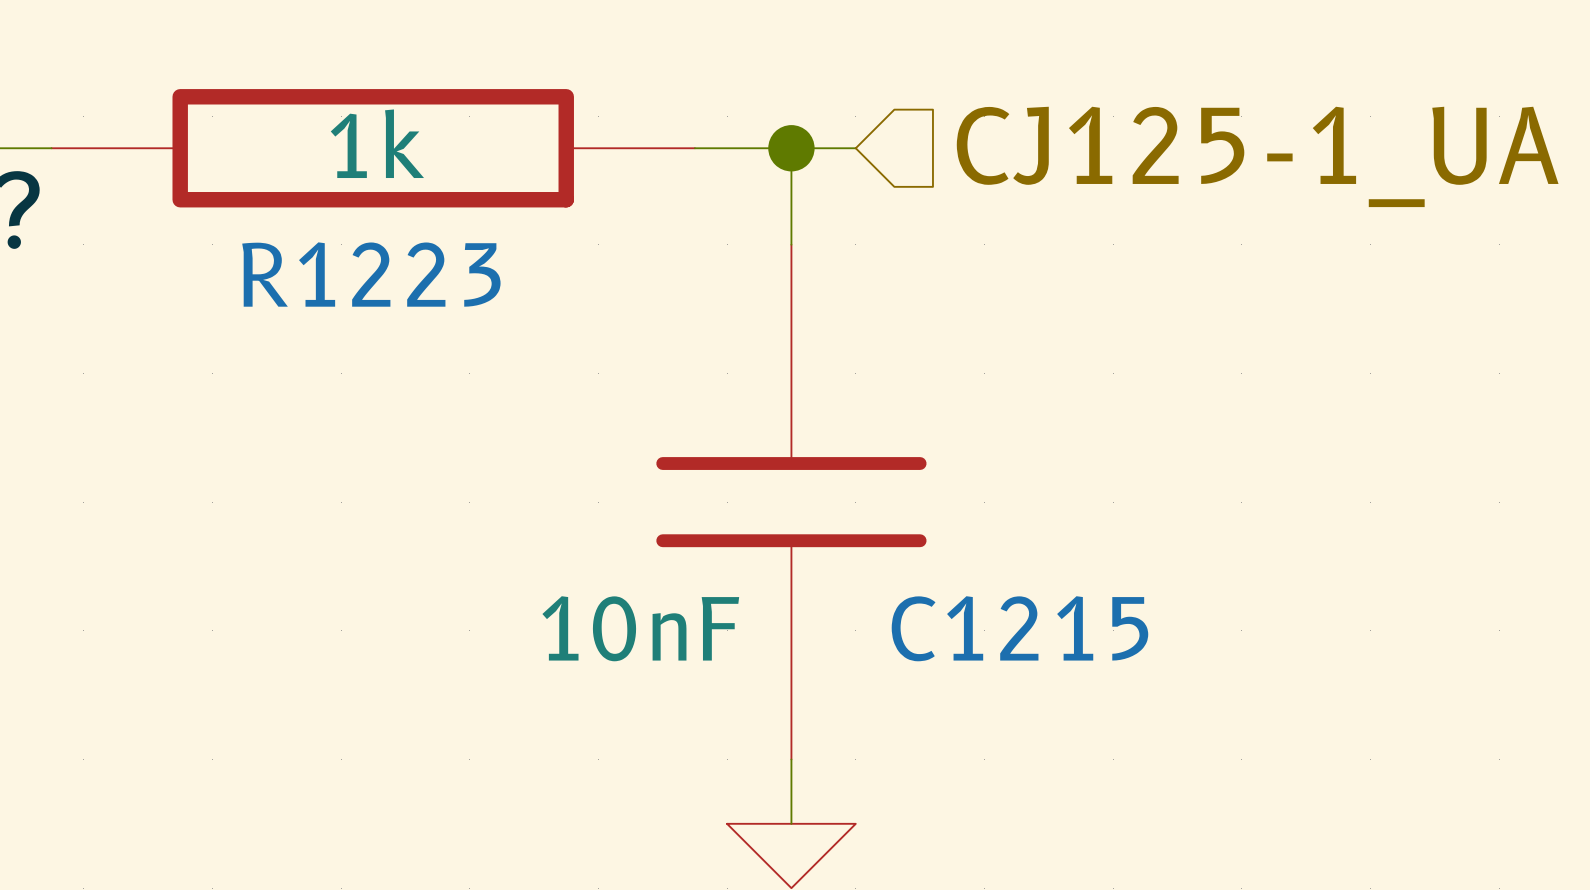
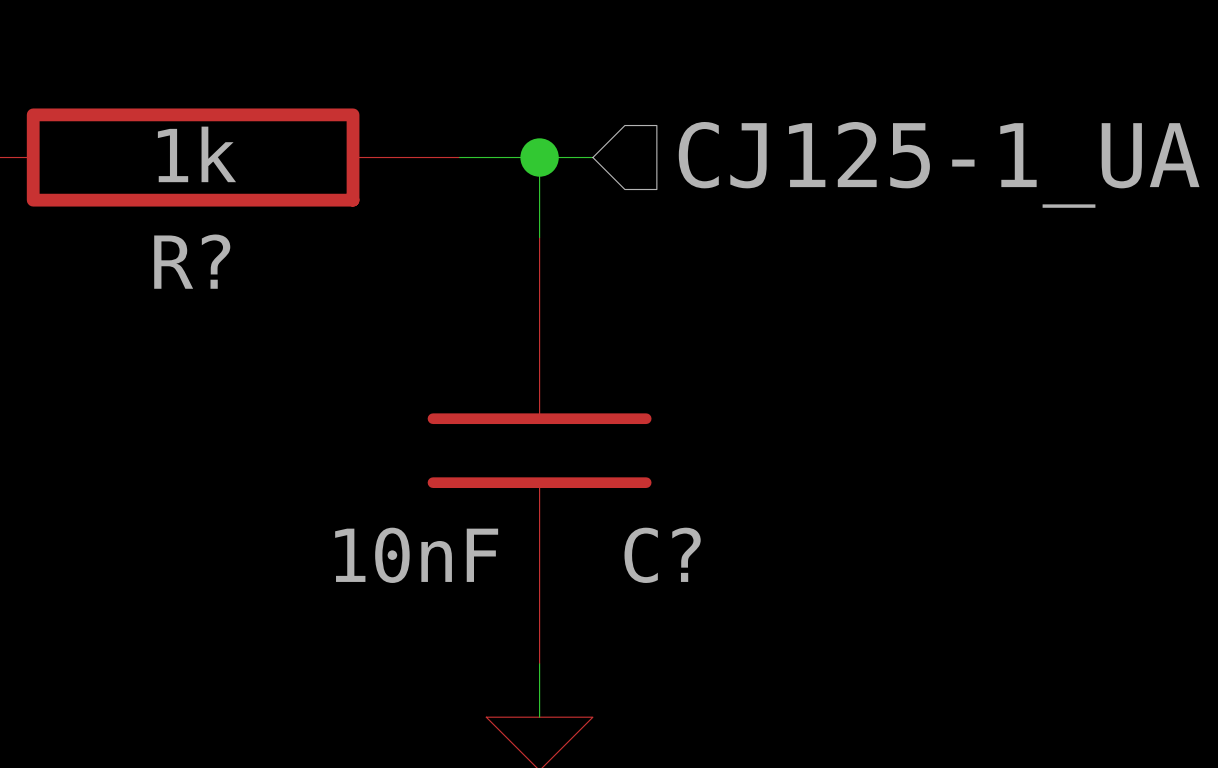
R1223 name: R1223 (371, 274) -> R? (192, 261)
C1215 name: C1215 (1019, 628) -> C? (662, 555)

